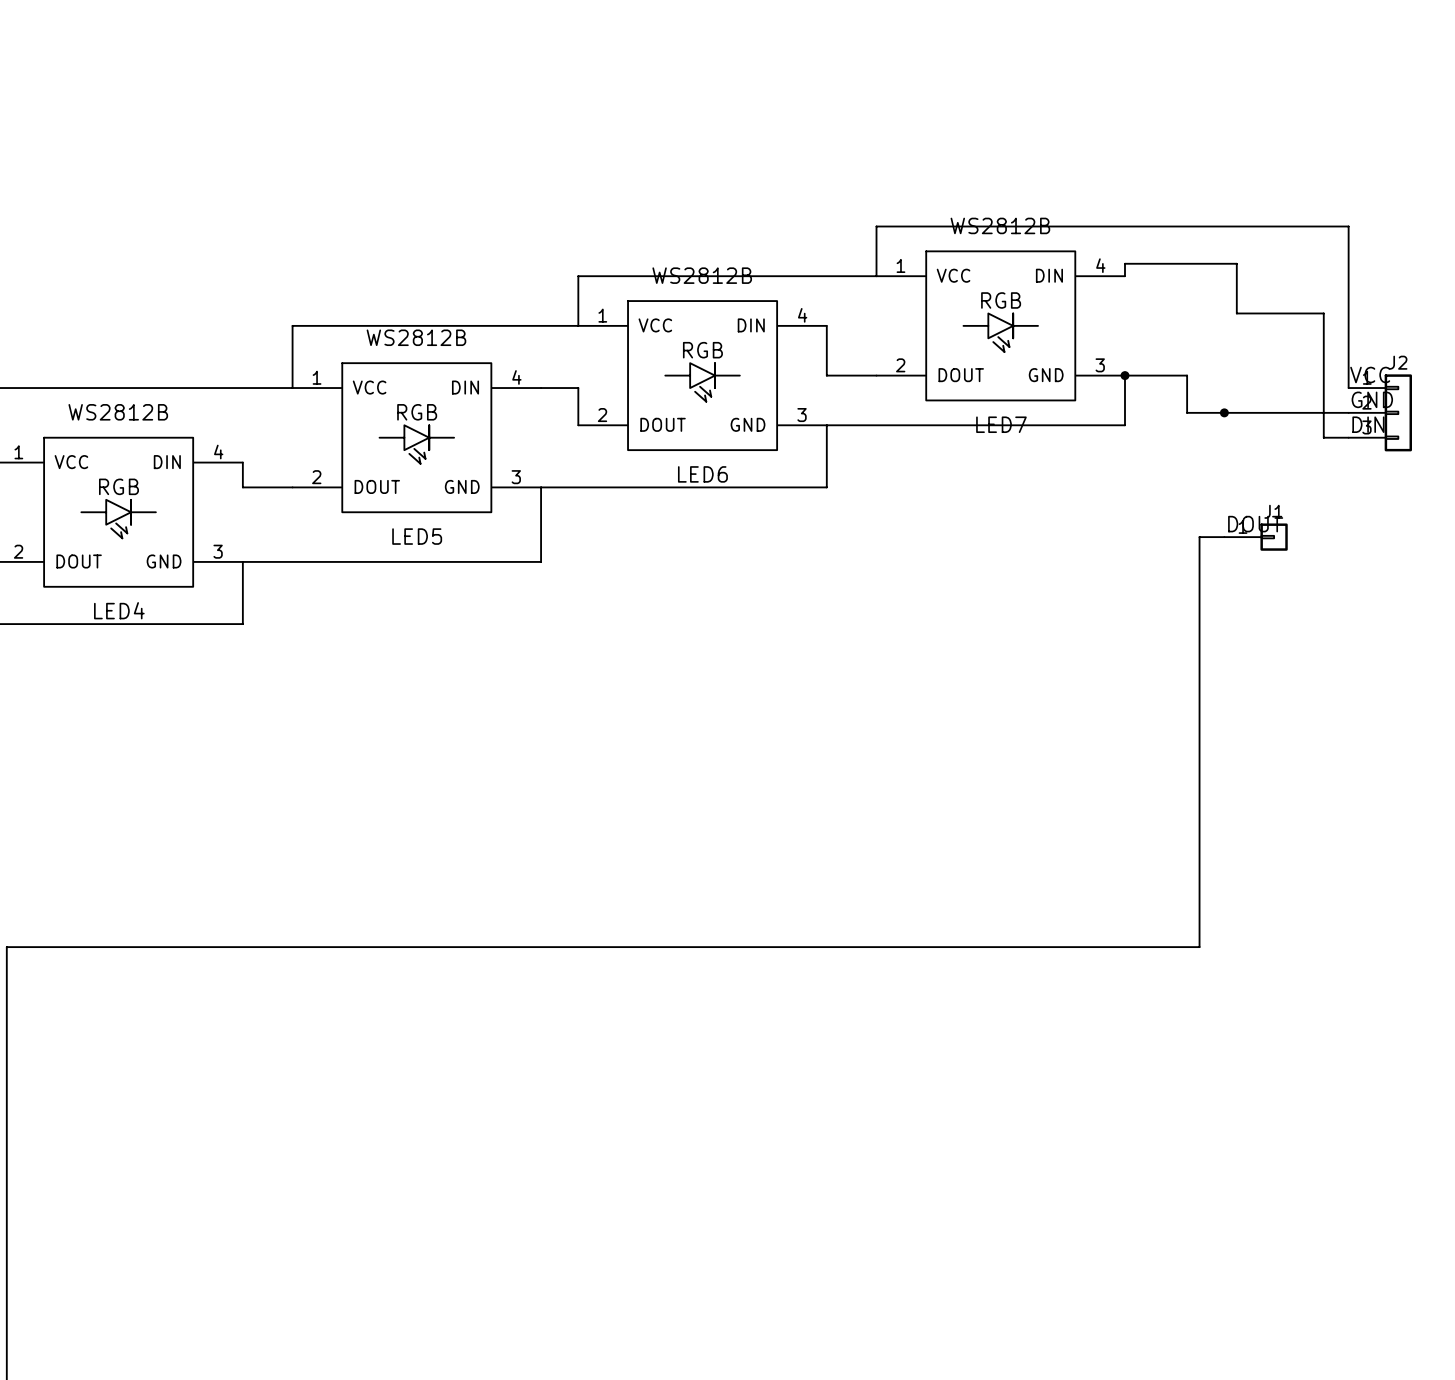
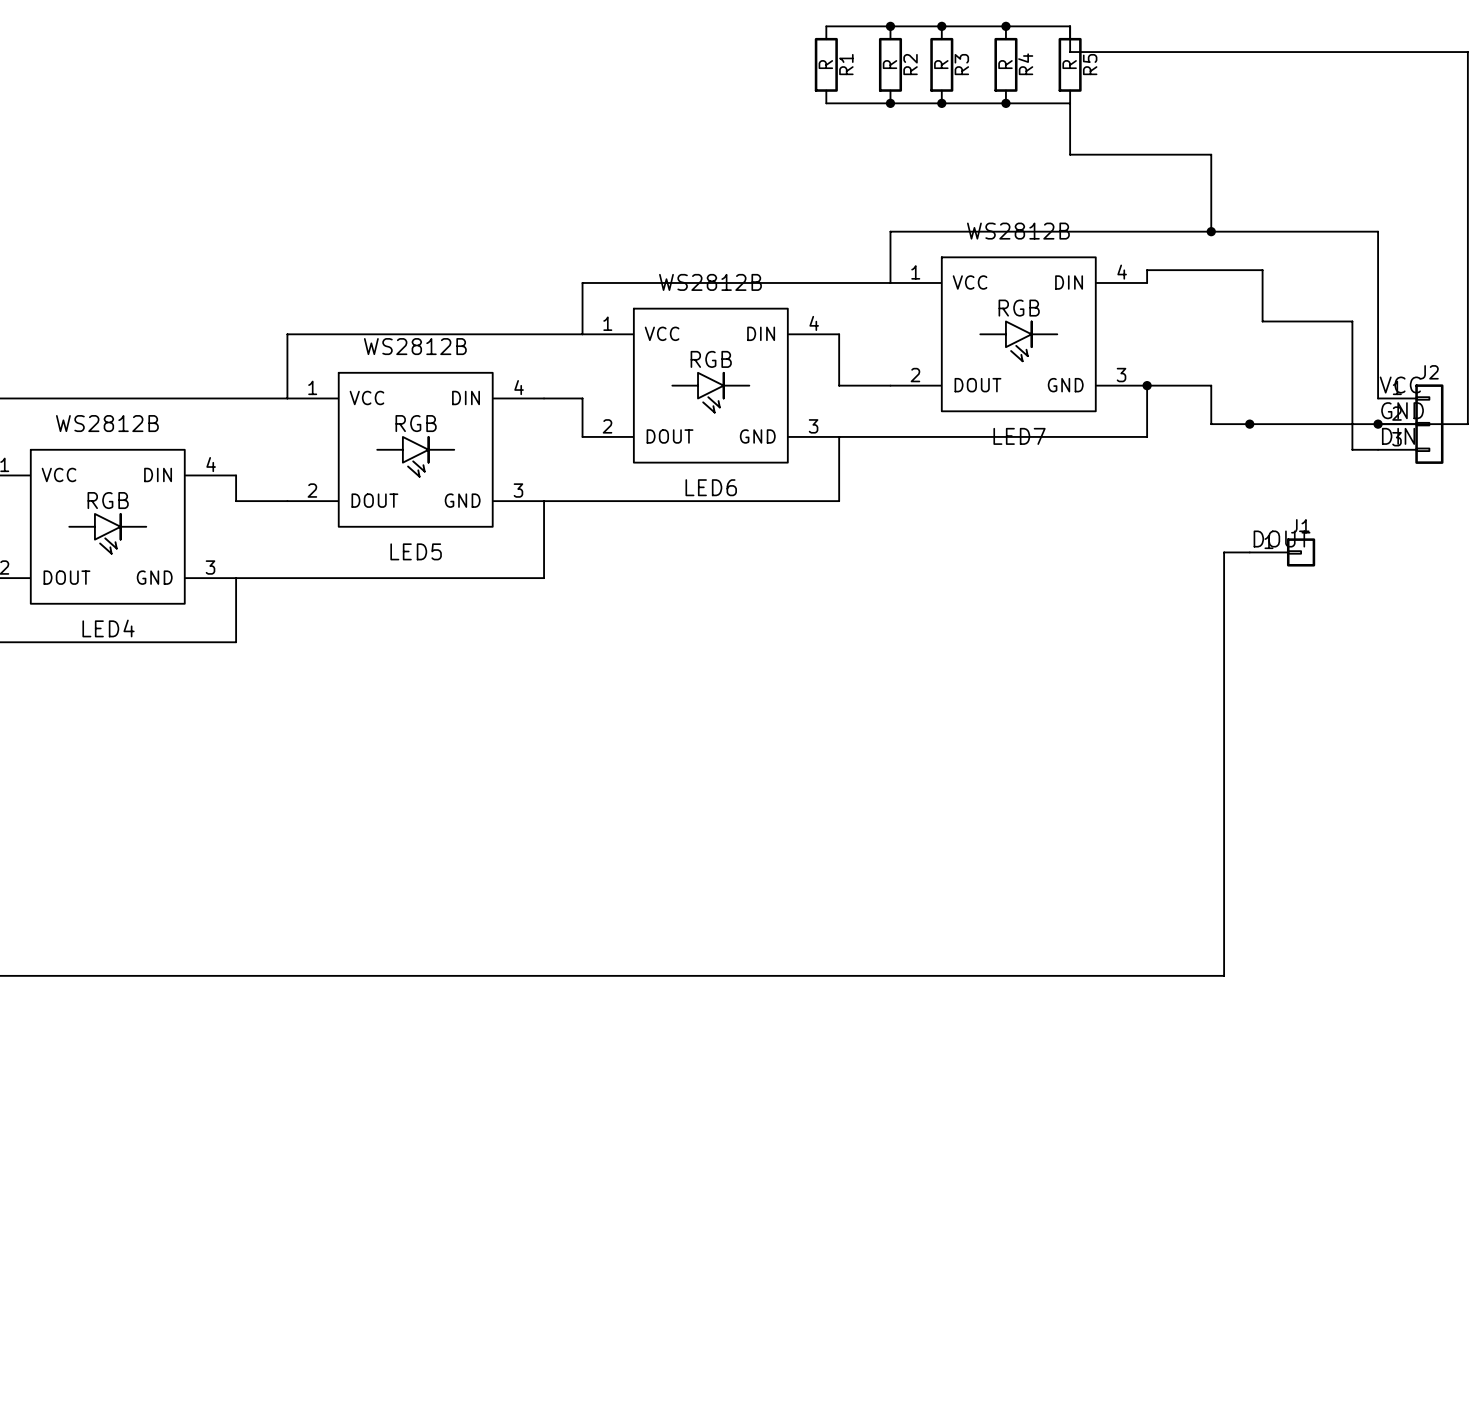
wire: none -> (826, 26) (1070, 26) (1070, 52) (1467, 52) (1467, 424) (1378, 424)
junction: none -> (890, 26)
junction: none -> (941, 26)
junction: none -> (1005, 26)
R1: none -> R (826, 64)
R2: none -> R (890, 64)
R3: none -> R (941, 64)
R4: none -> R (1005, 64)
R5: none -> R (1070, 64)
wire: none -> (826, 103) (1070, 103) (1070, 154) (1211, 154) (1211, 231)
junction: none -> (890, 103)
junction: none -> (941, 103)
junction: none -> (1005, 103)
junction: none -> (1211, 231)
junction: none -> (1378, 424)

